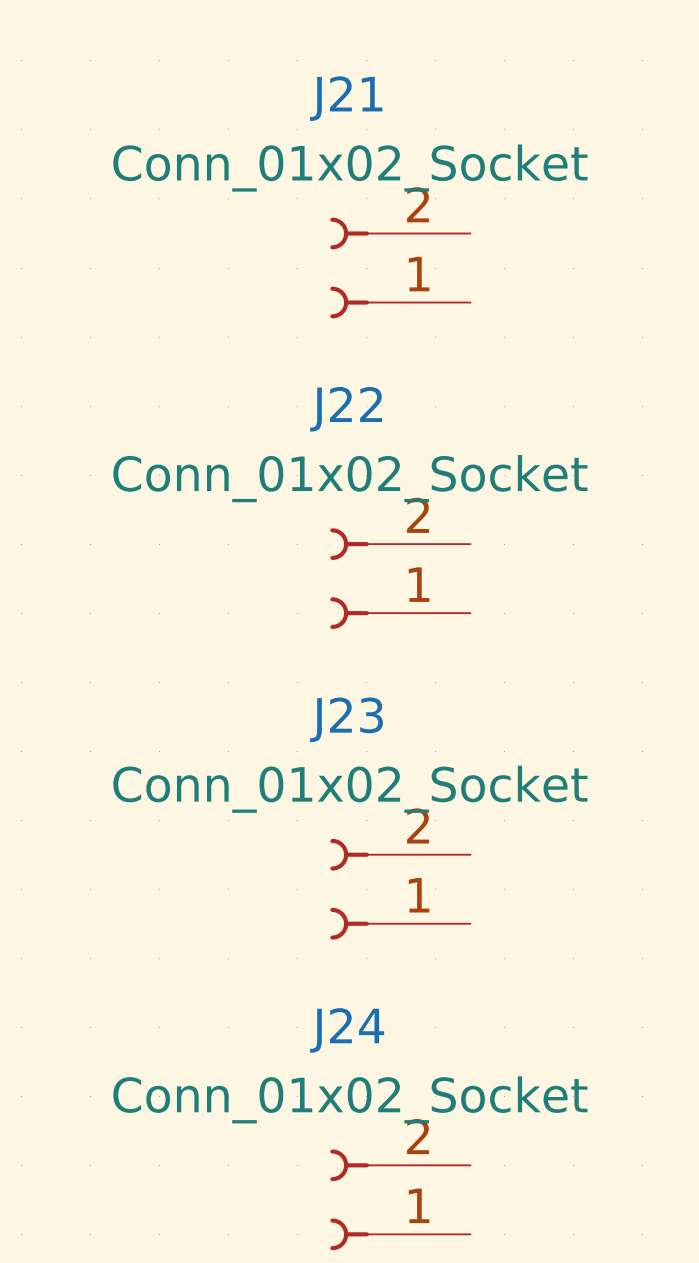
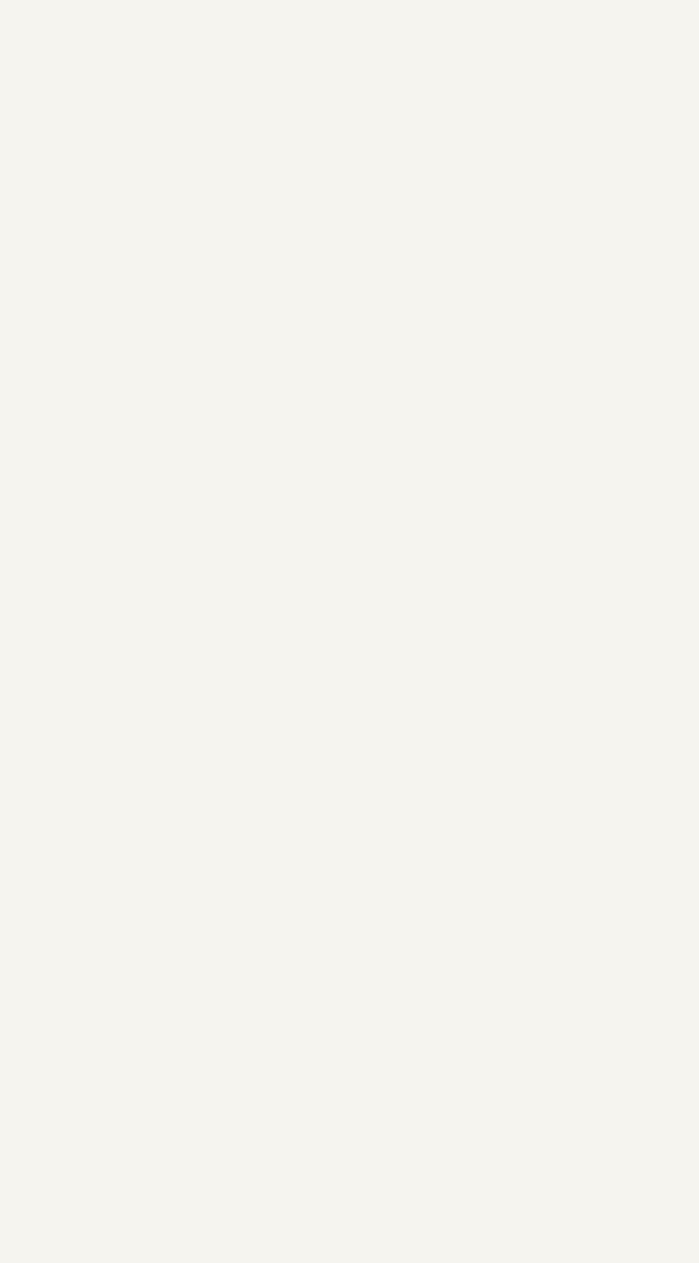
J21: Conn_01x02_Socket (400, 268) -> none
J22: Conn_01x02_Socket (400, 578) -> none
J23: Conn_01x02_Socket (400, 889) -> none
J24: Conn_01x02_Socket (400, 1199) -> none

